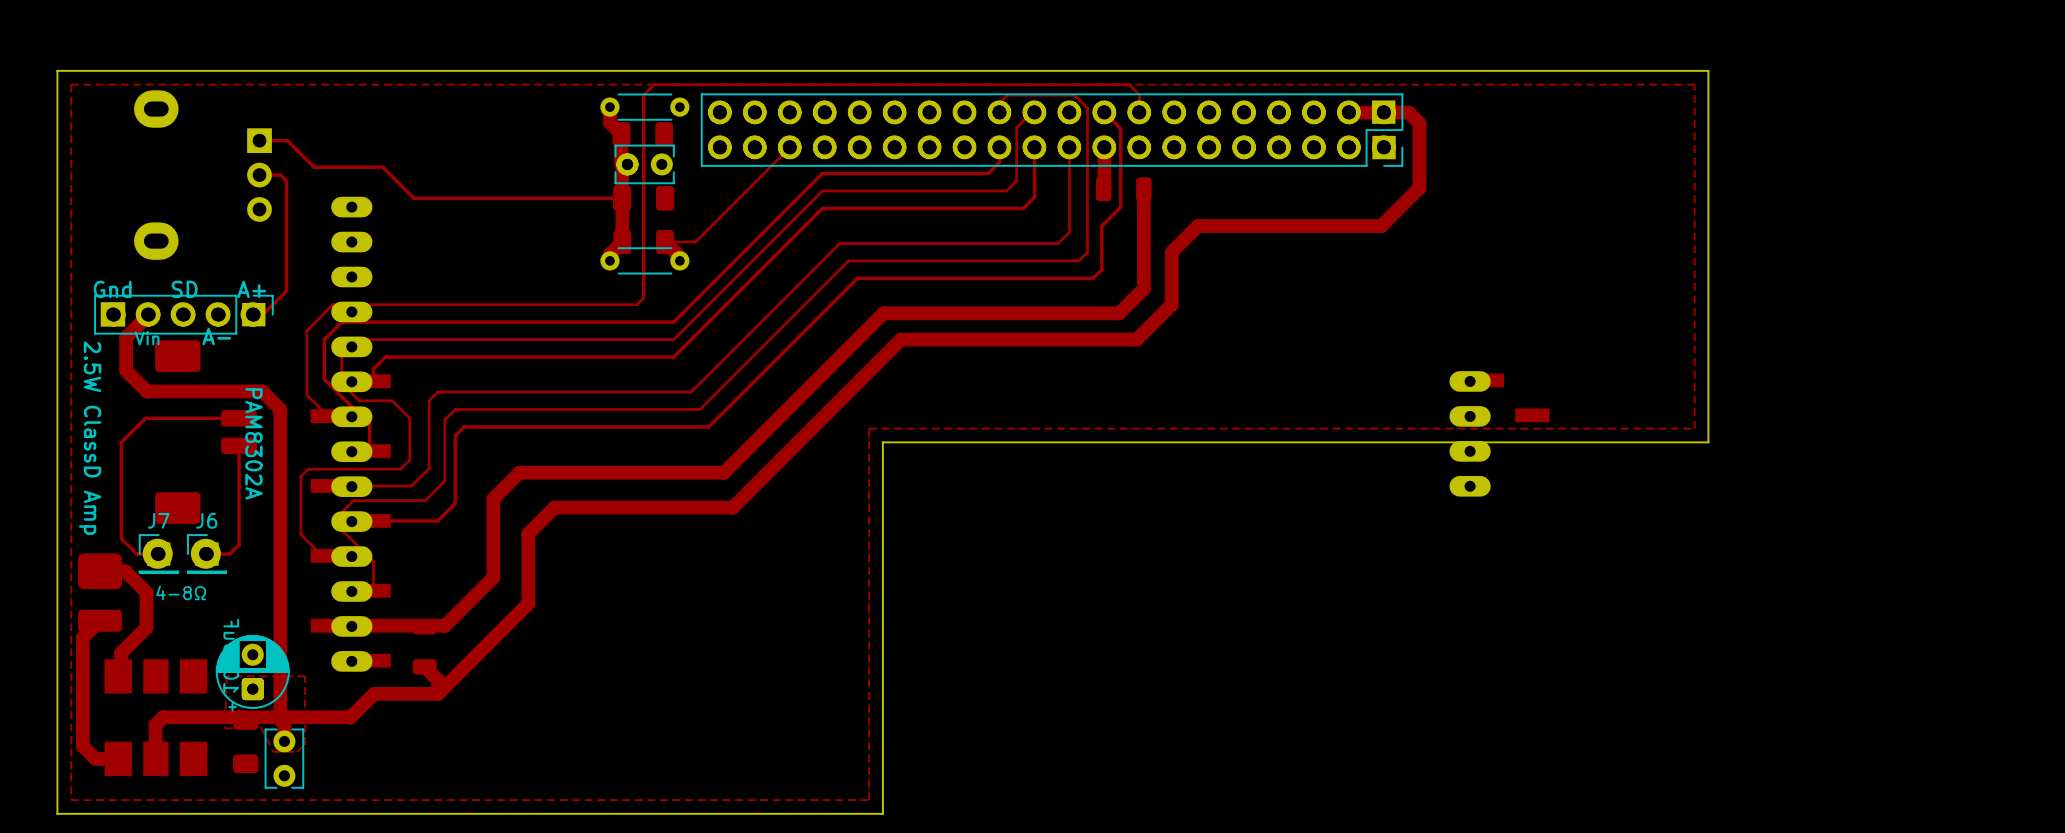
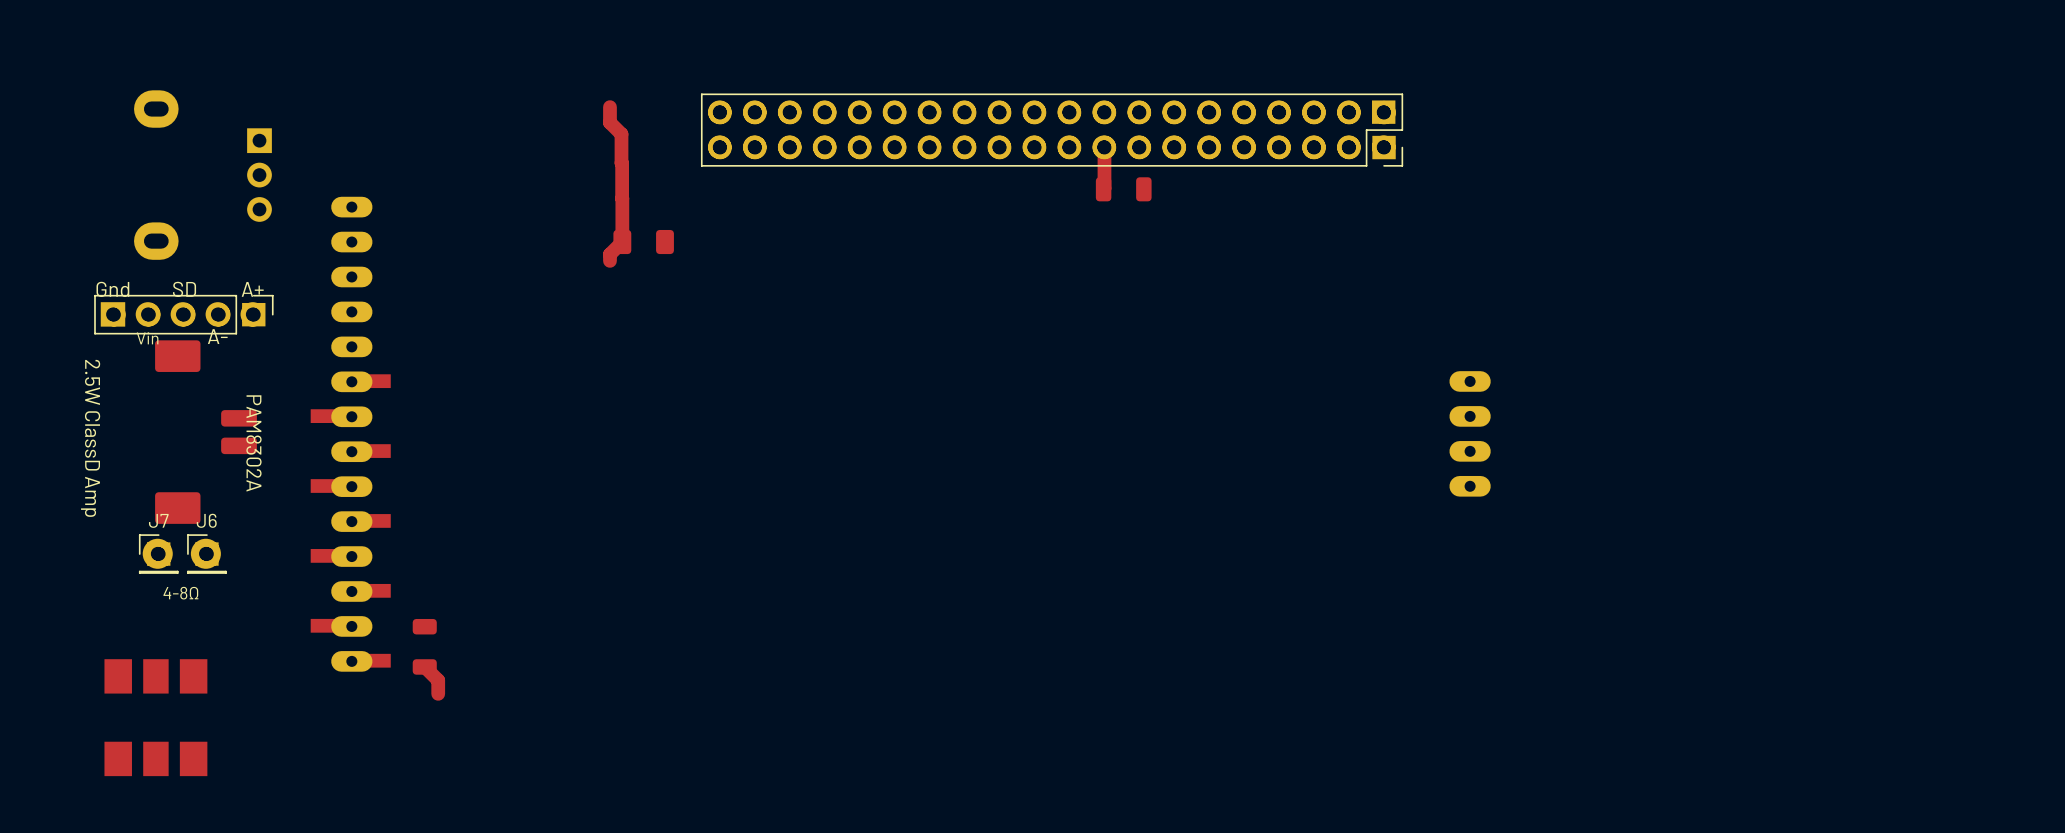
board edge: (1708, 70) (1708, 442) (882, 442) (882, 813) (57, 813) (57, 70) (1708, 70) -> none
top zone outline: (1694, 84) (71, 84) (71, 800) (869, 800) (869, 428) (1694, 428) (1694, 84) -> none
part: (644, 107) -> none
top track: (999, 112) (999, 102) (1007, 95) (1074, 95) (1087, 108) (1087, 252) (1078, 260) (848, 260) (699, 409) (455, 409) (444, 420) (444, 481) (425, 500) (353, 500) (343, 511) (343, 531) (373, 561) (373, 590) -> none
top track: (1034, 112) (1031, 112) (1016, 127) (1016, 180) (1006, 191) (822, 191) (673, 339) (359, 339) (341, 357) (341, 383) (359, 400) (392, 400) (409, 418) (409, 460) (400, 469) (308, 469) (300, 476) (300, 534) (322, 555) (327, 555) -> none
top track: (1104, 112) (1120, 128) (1120, 207) (1101, 226) (1101, 269) (1093, 278) (857, 278) (708, 426) (464, 426) (455, 435) (455, 503) (437, 520) (373, 520) -> none
top track: (1139, 112) (1139, 94) (1129, 84) (654, 84) (643, 95) (643, 297) (636, 304) (333, 304) (306, 330) (306, 394) (327, 416) -> none
top track: (1349, 112) (1408, 112) (1419, 123) (1419, 187) (1381, 226) (1197, 226) (1171, 252) (1171, 304) (1136, 339) (900, 339) (732, 507) (554, 507) (528, 533) (528, 603) (438, 693) (374, 693) (350, 717) (163, 717) (155, 724) (155, 758) -> none
part: (642, 134) -> none
top track: (259, 140) (287, 140) (314, 167) (382, 167) (413, 198) (622, 198) -> none
top track: (789, 147) (695, 242) (664, 242) (679, 256) (679, 260) -> none
top track: (999, 147) (999, 162) (988, 173) (822, 173) (673, 322) (341, 322) (324, 339) (324, 379) (369, 424) (369, 447) (365, 451) (373, 451) -> none
top track: (1034, 147) (1034, 197) (1023, 208) (822, 208) (673, 357) (385, 357) (373, 369) (373, 381) -> none
top track: (1070, 148) (1069, 232) (1058, 243) (839, 243) (691, 392) (437, 392) (429, 400) (429, 468) (411, 486) (327, 486) -> none
part: (627, 164) -> none
part: (644, 164) -> none
top track: (259, 175) (280, 175) (286, 180) (286, 291) (262, 314) (253, 314) -> none
top track: (1143, 189) (1143, 288) (1119, 313) (883, 313) (724, 472) (519, 472) (493, 498) (493, 577) (445, 625) (327, 625) -> none
part: (643, 198) -> none
part: (644, 260) -> none
top track: (148, 314) (126, 337) (126, 370) (146, 391) (262, 391) (280, 409) (280, 714) (277, 717) (284, 724) (284, 741) -> none
part: (1509, 397) -> none
top track: (239, 418) (145, 418) (121, 442) (121, 538) (136, 554) (158, 554) -> none
top track: (239, 445) (239, 544) (229, 554) (206, 554) -> none
top track: (100, 571) (125, 571) (146, 592) (146, 627) (120, 653) (120, 676) -> none
part: (100, 592) -> none
top track: (100, 620) (82, 637) (82, 746) (95, 758) (120, 758) -> none
part: (252, 673) -> none
top zone outline: (305, 676) (226, 676) (225, 728) (261, 727) (273, 751) (296, 751) (305, 745) (305, 676) -> none
part: (252, 689) -> none
part: (245, 742) -> none
part: (284, 758) -> none
part: (245, 763) -> none

